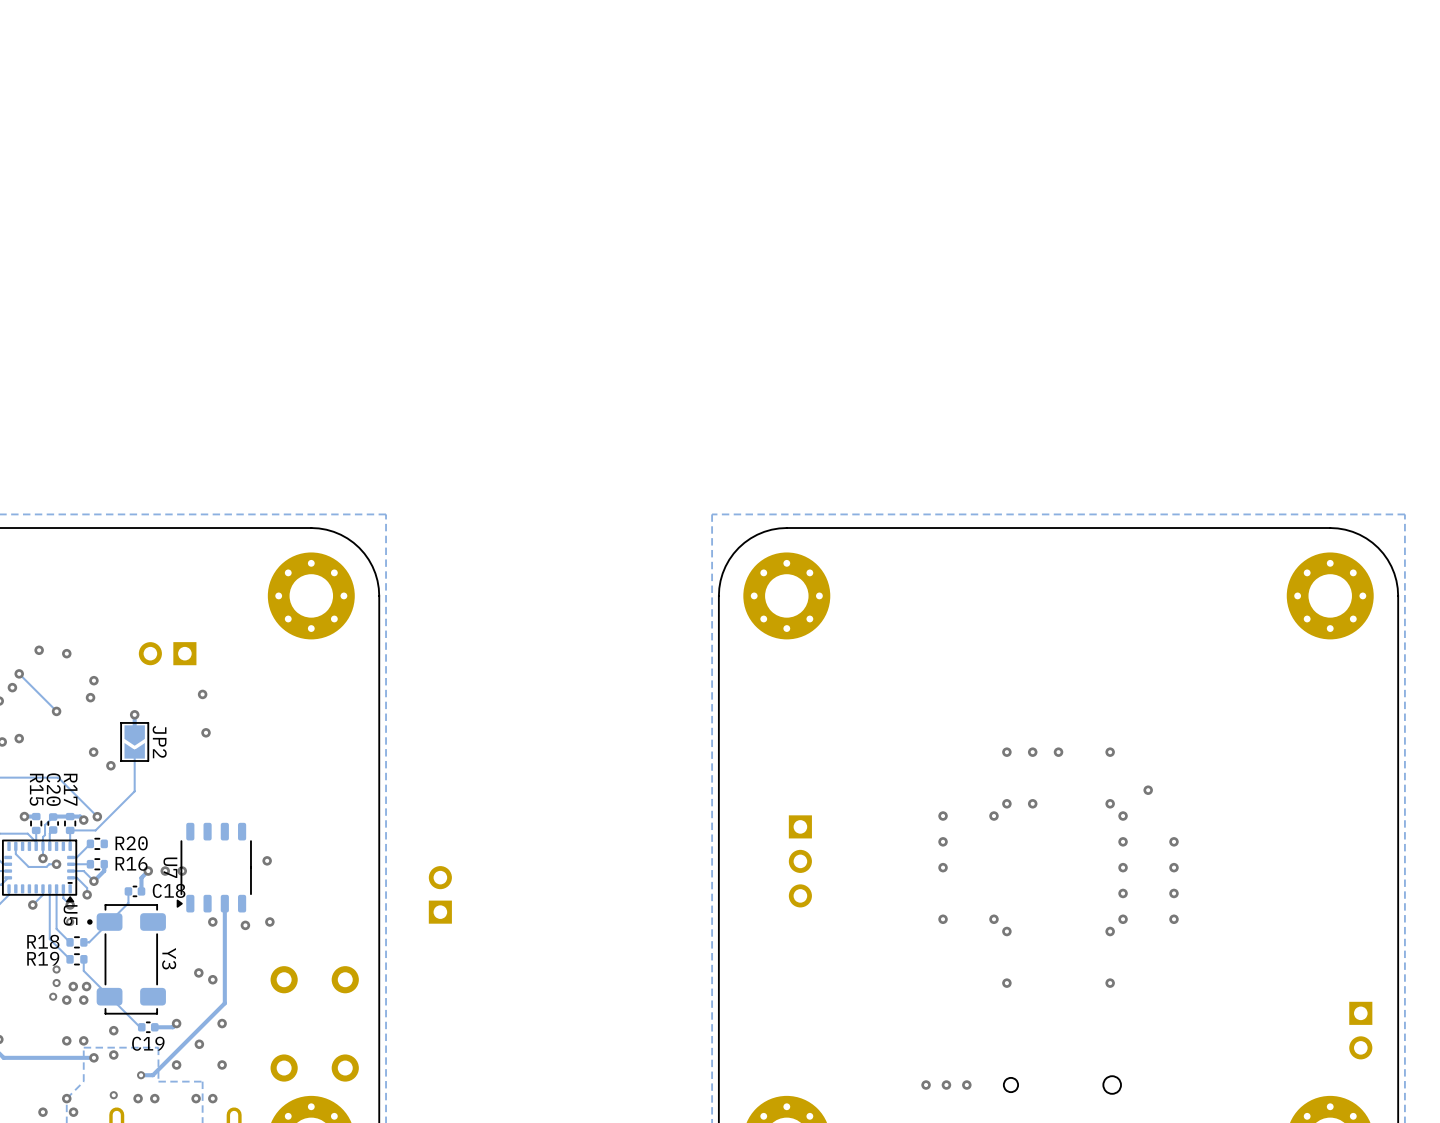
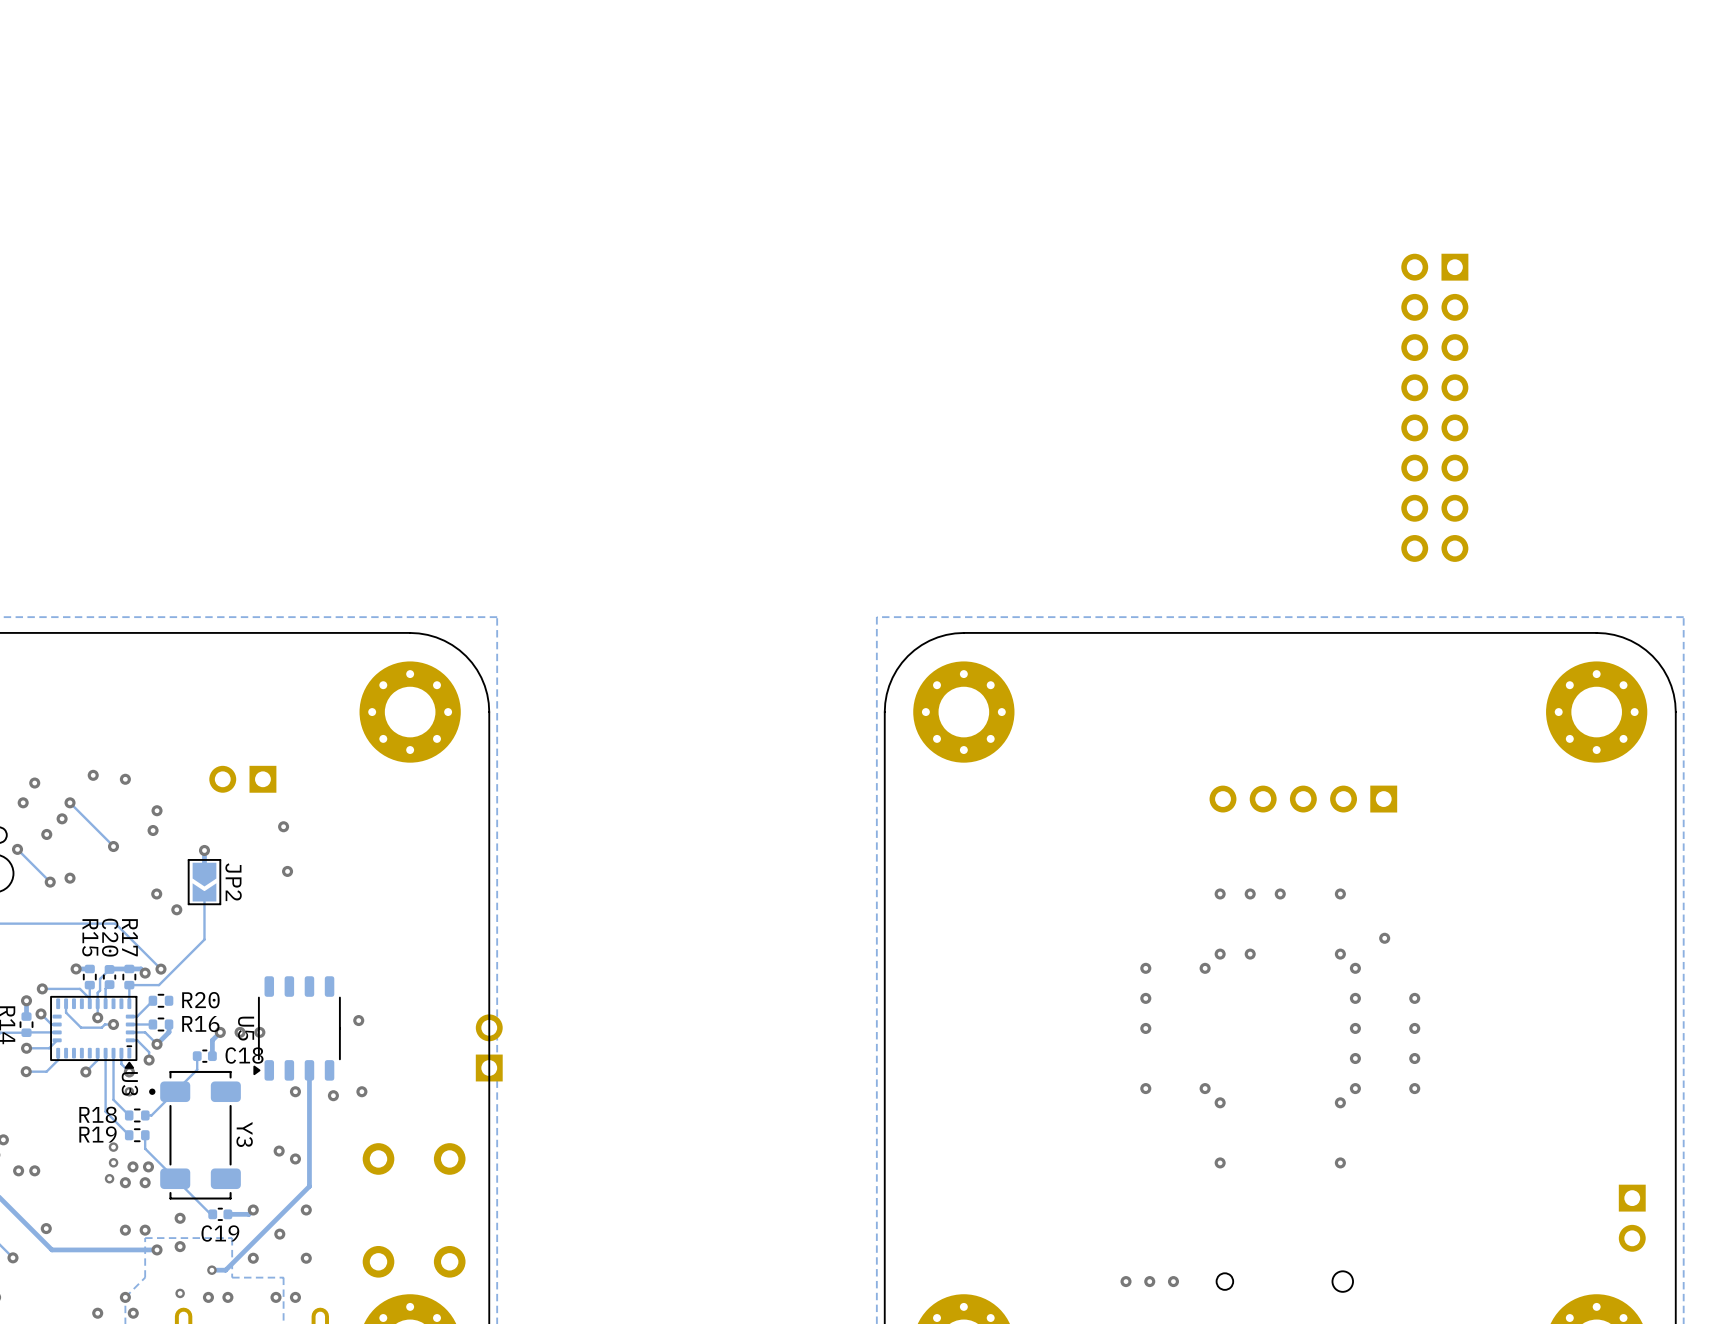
part: none -> (1434, 407)
part: none -> (1303, 799)
part: (800, 861) -> none
U7 name: U7 (170, 867) -> U5 (246, 1028)
part position: (440, 894) -> (489, 1047)
U5 name: U5 (70, 915) -> U3 (129, 1083)

